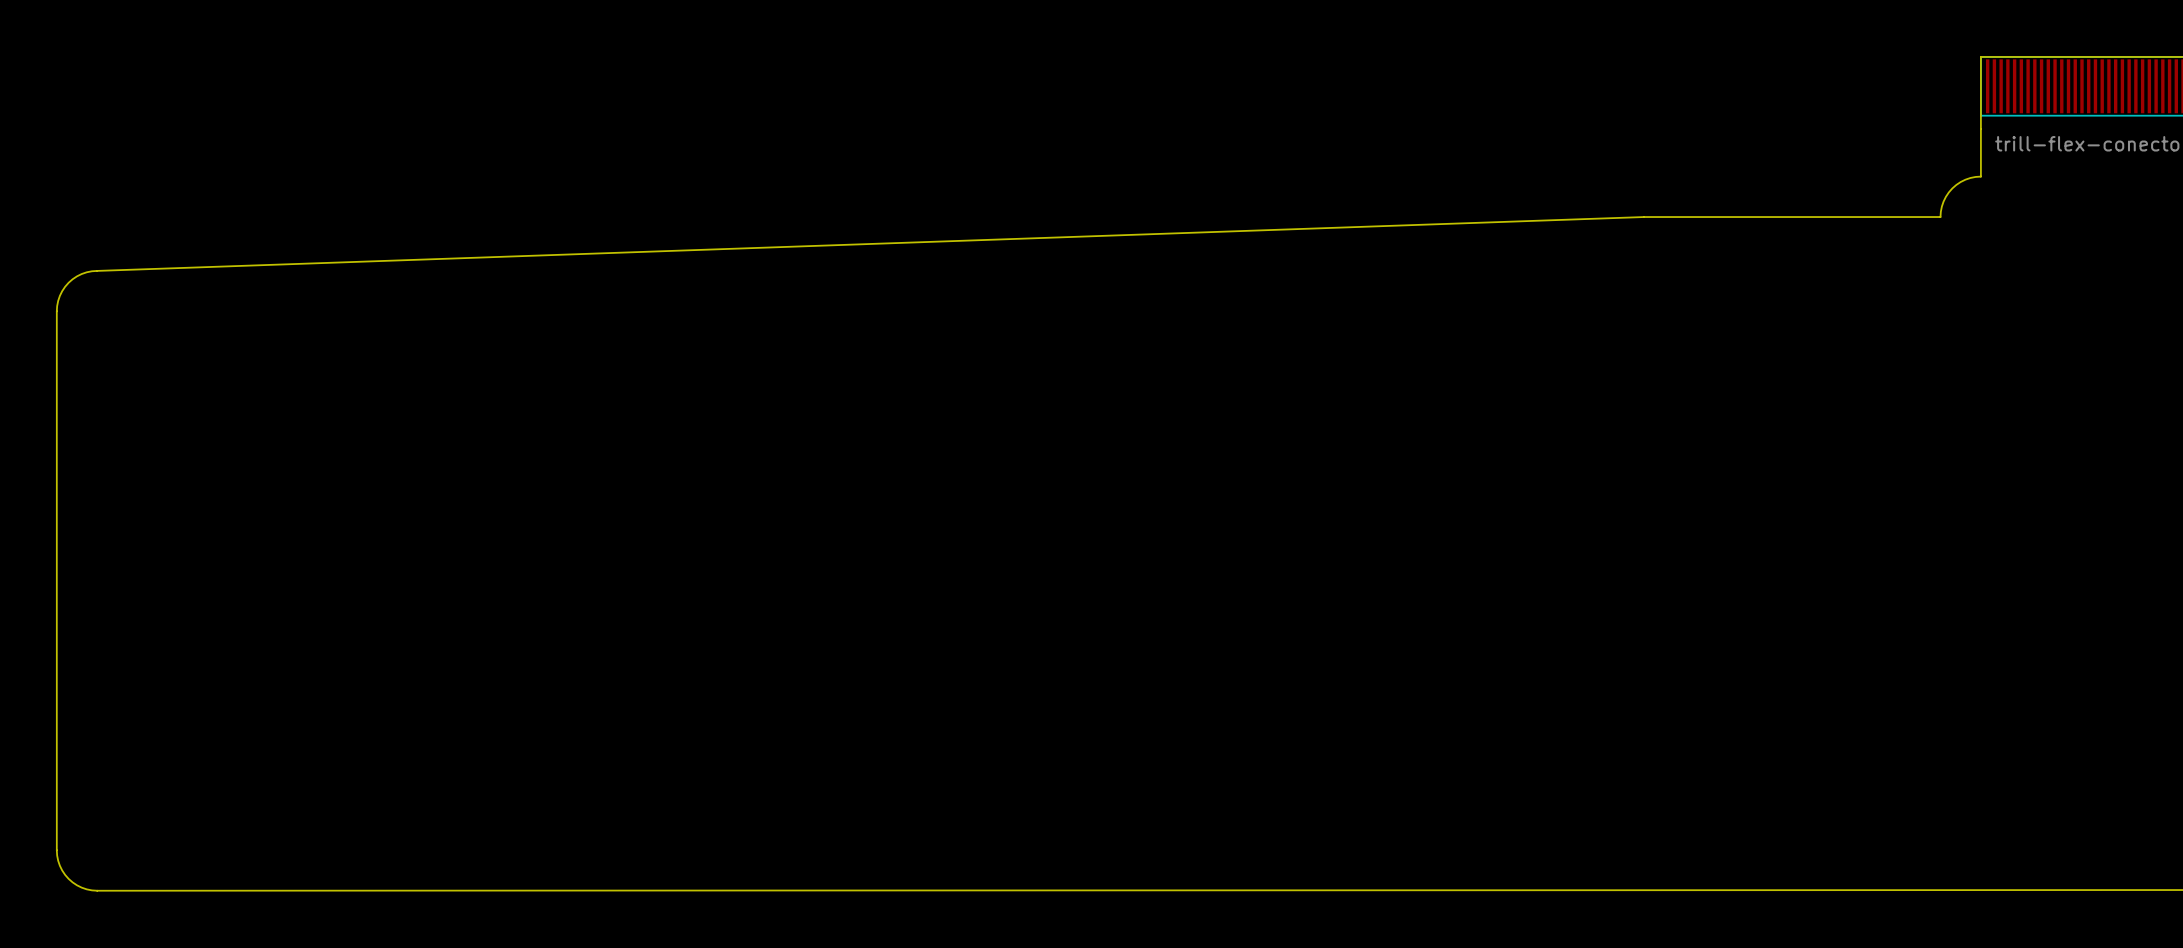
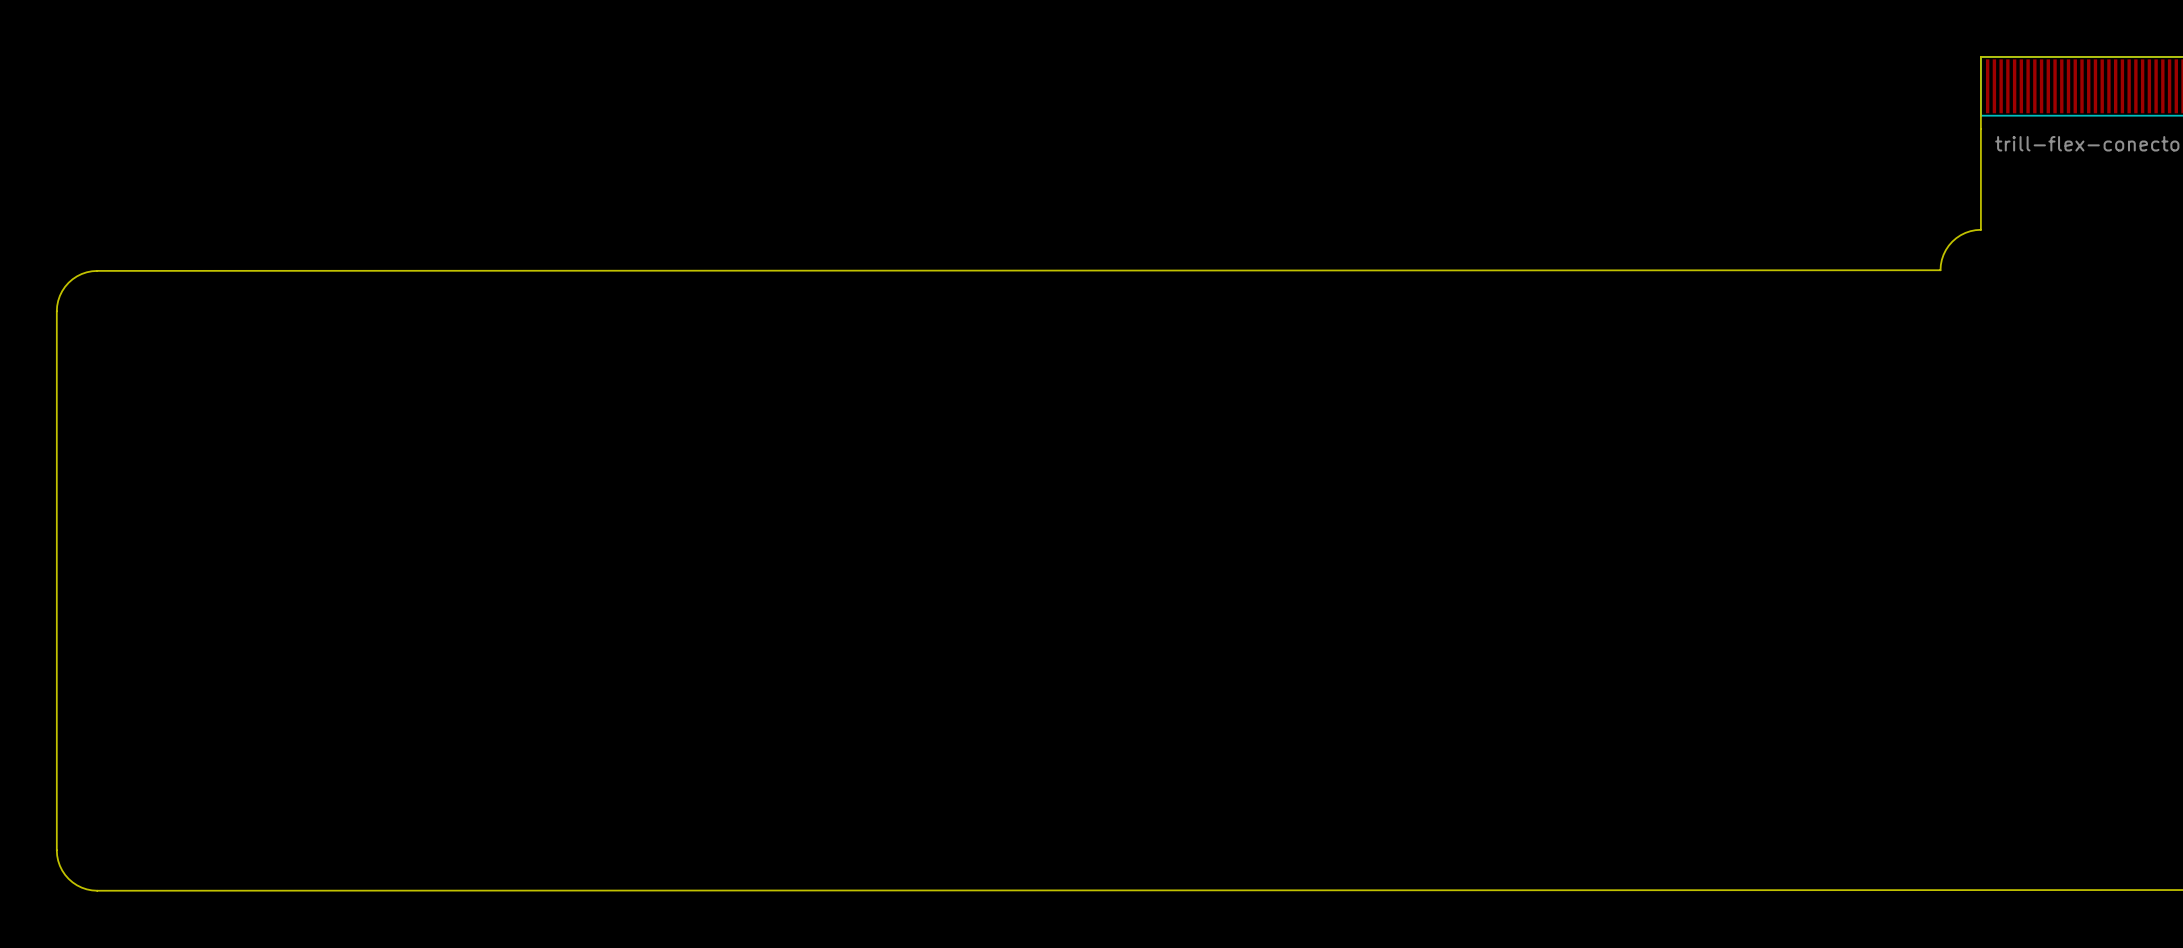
board edge: (1980, 176) (1965, 179) (1952, 188) (1943, 201) (1940, 217) (1644, 217) (97, 270) -> (1980, 176) (1980, 229) (1965, 232) (1952, 241) (1943, 254) (1940, 270) (97, 270)

